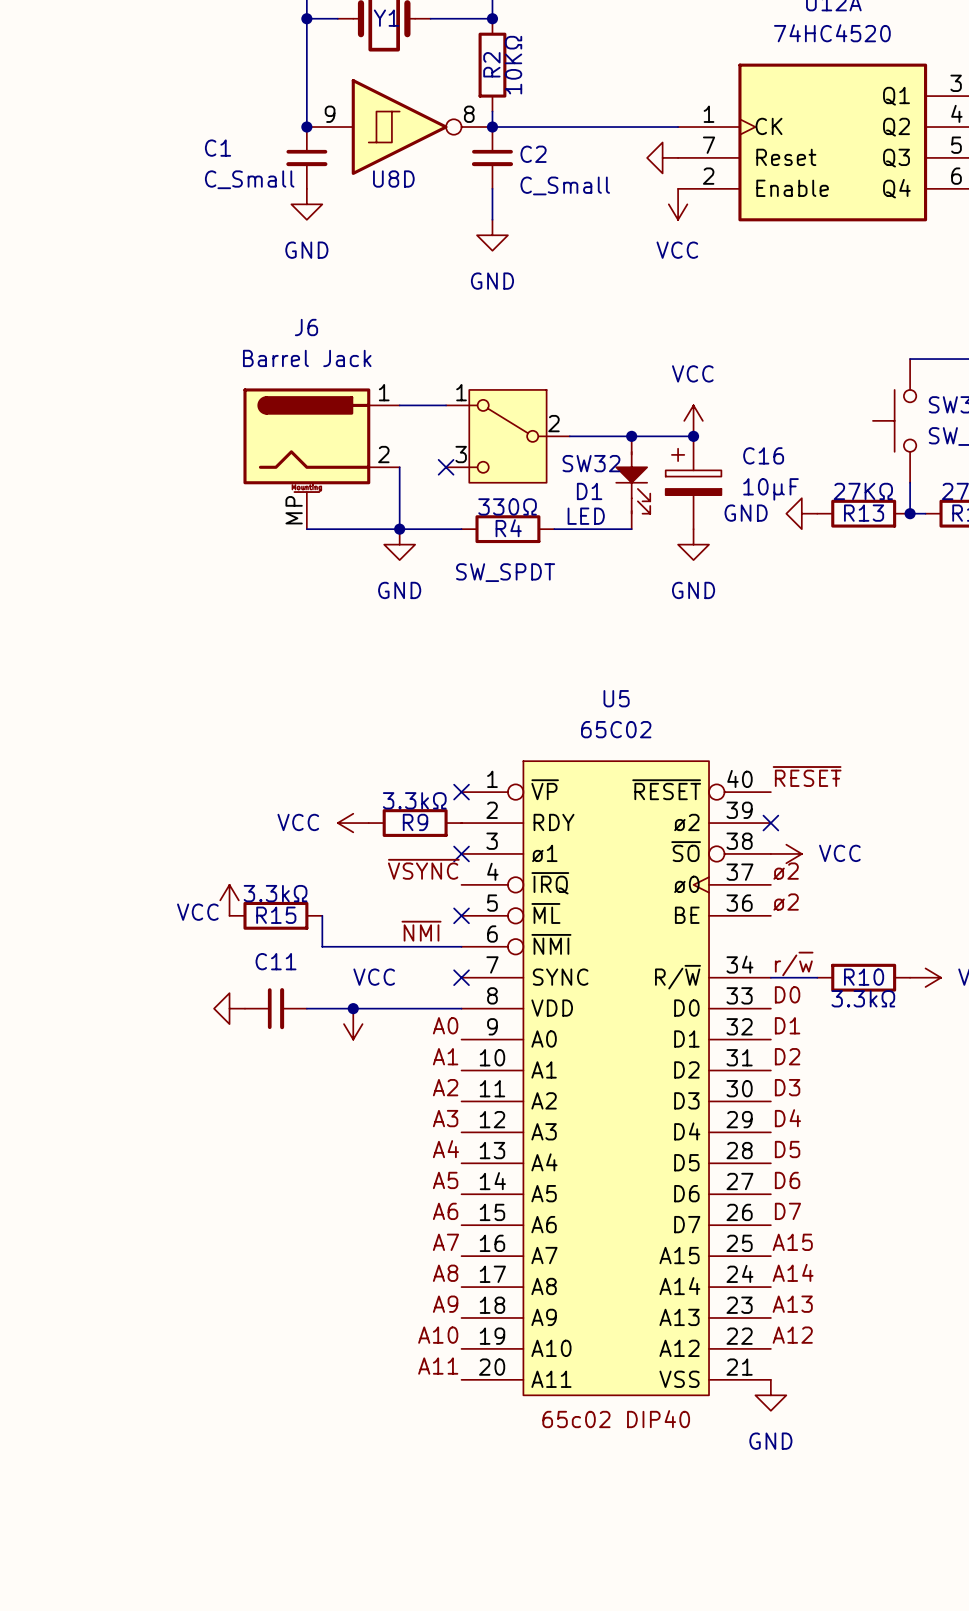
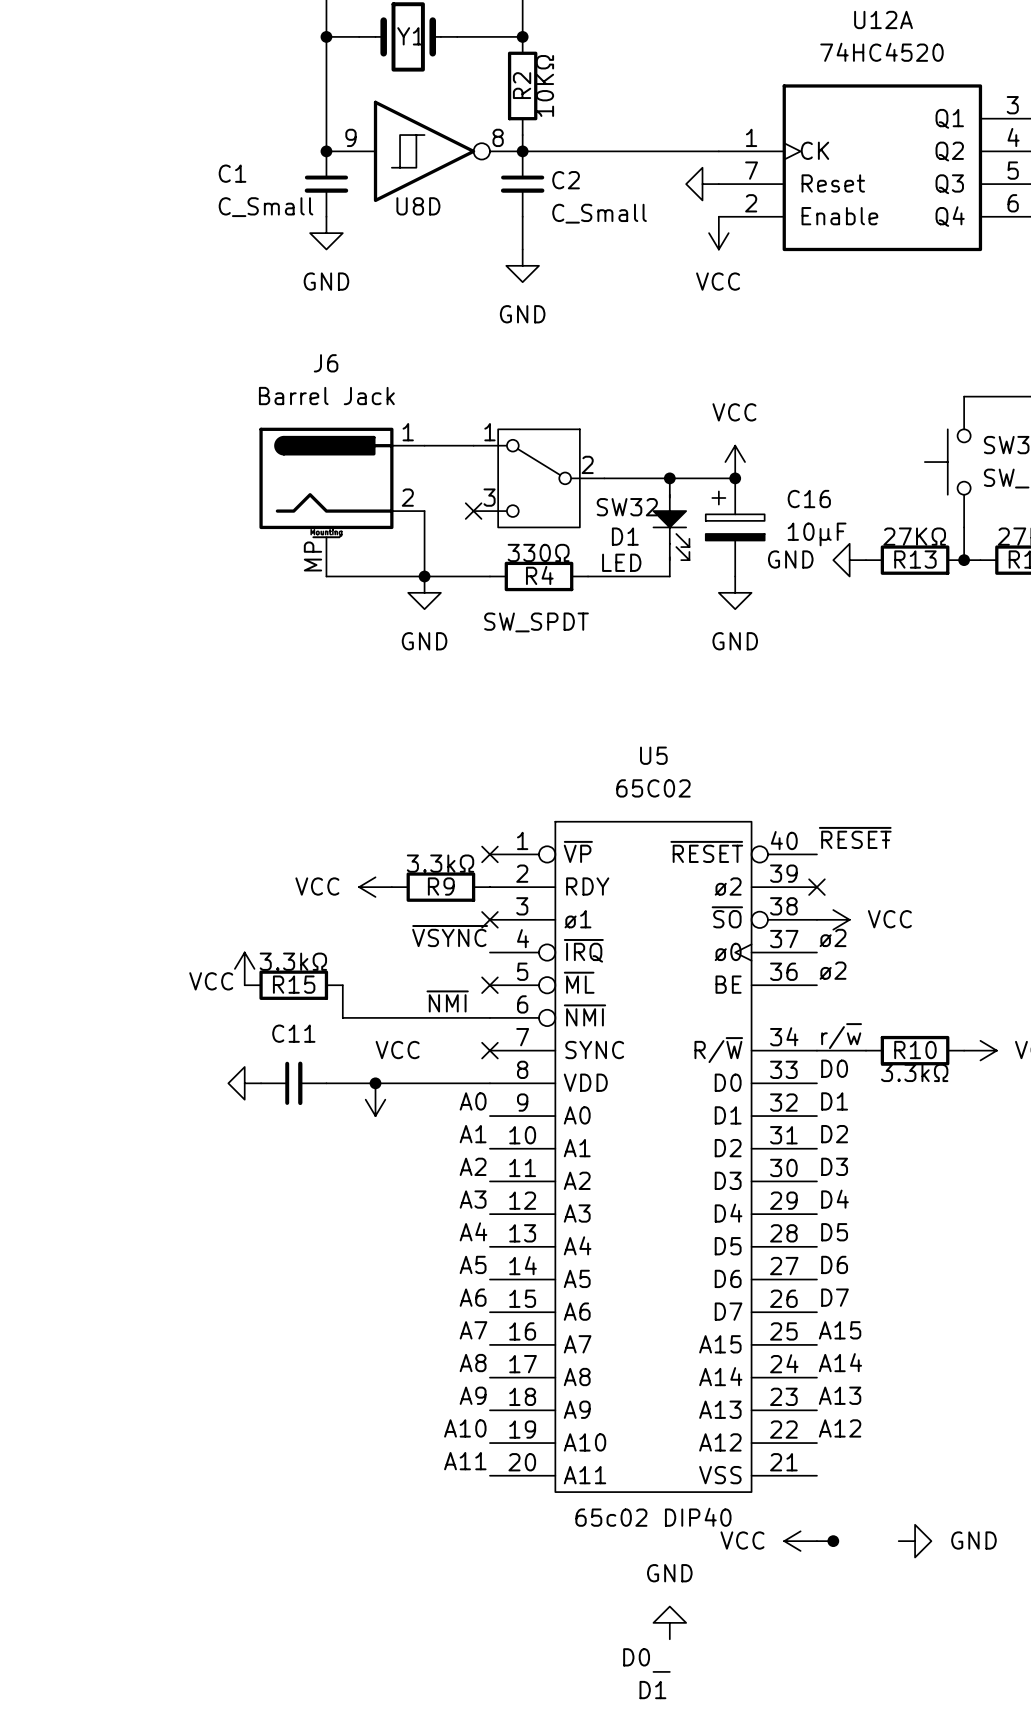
power symbol: GND (770, 1395) -> none
power symbol: none -> VCC (800, 1541)
wire: none -> (816, 1541) (833, 1541)
junction: none -> (833, 1541)
power symbol: none -> GND (915, 1541)
power symbol: none -> GND (669, 1622)
label: none -> D0 (636, 1657)
wire: none -> (653, 1671) (669, 1671)
label: none -> D1 (652, 1690)

